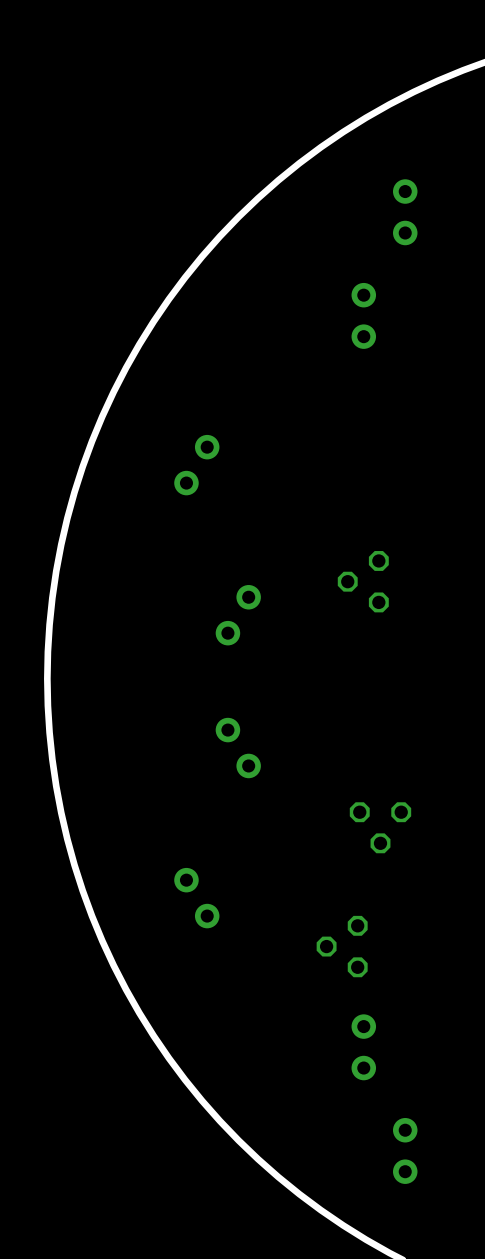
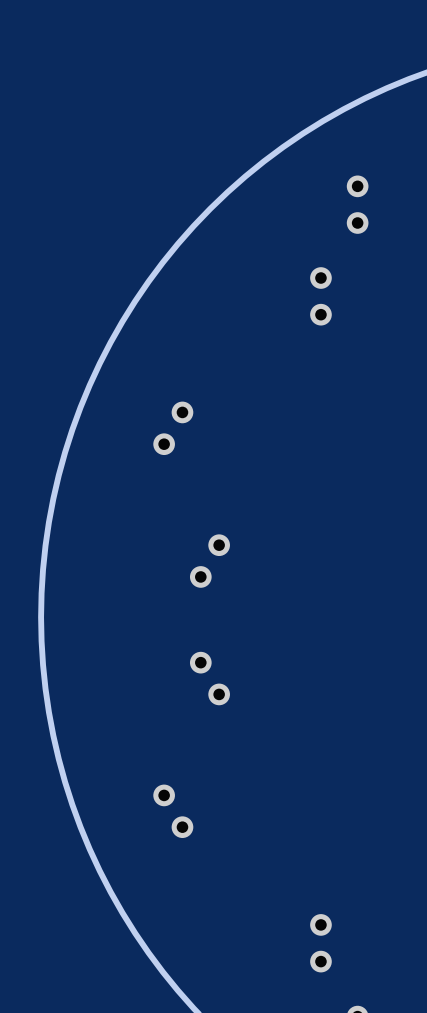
part: (363, 581) -> none
part: (380, 827) -> none
part: (342, 946) -> none

